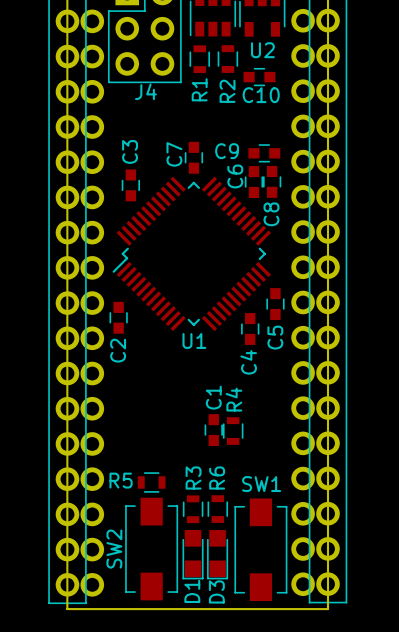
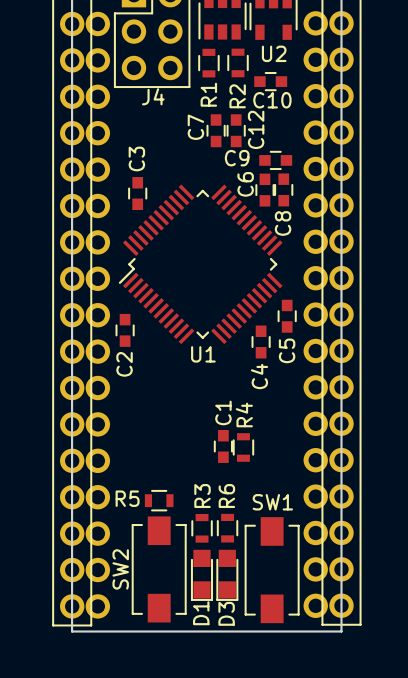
C12: none -> (236, 130)
C7 position: (193, 157) -> (216, 130)

